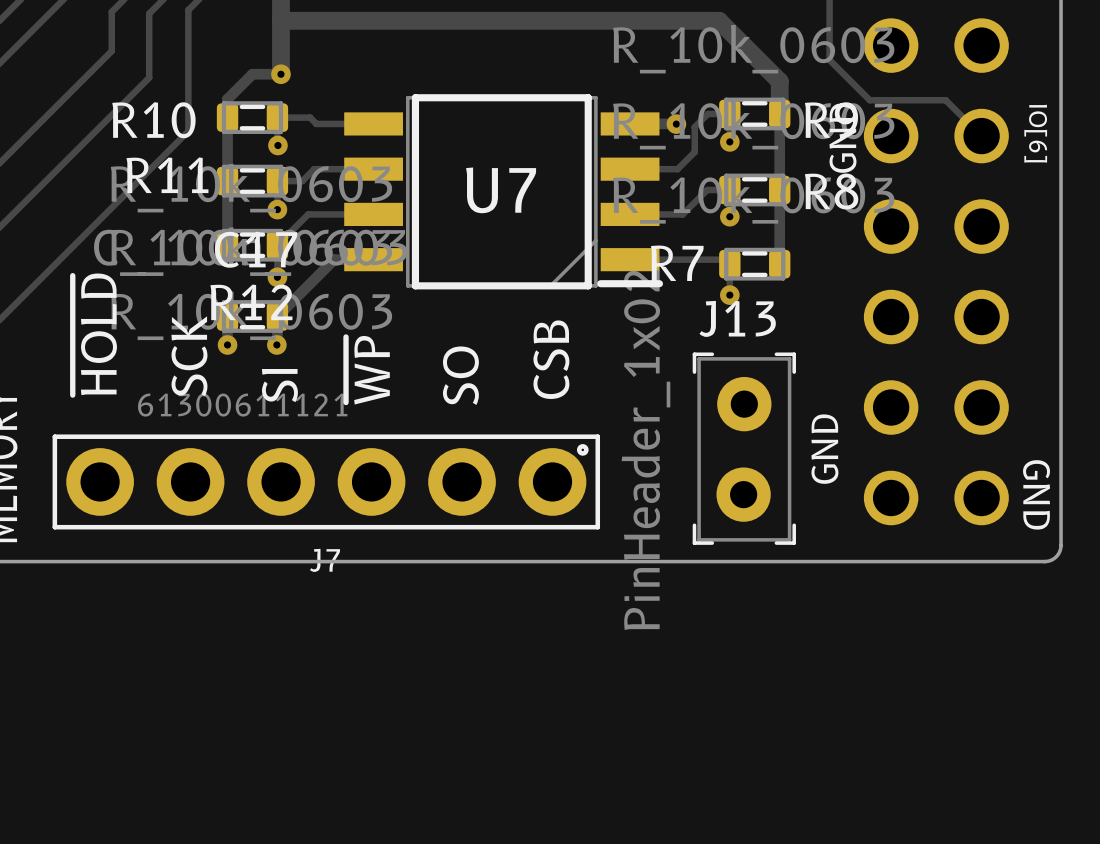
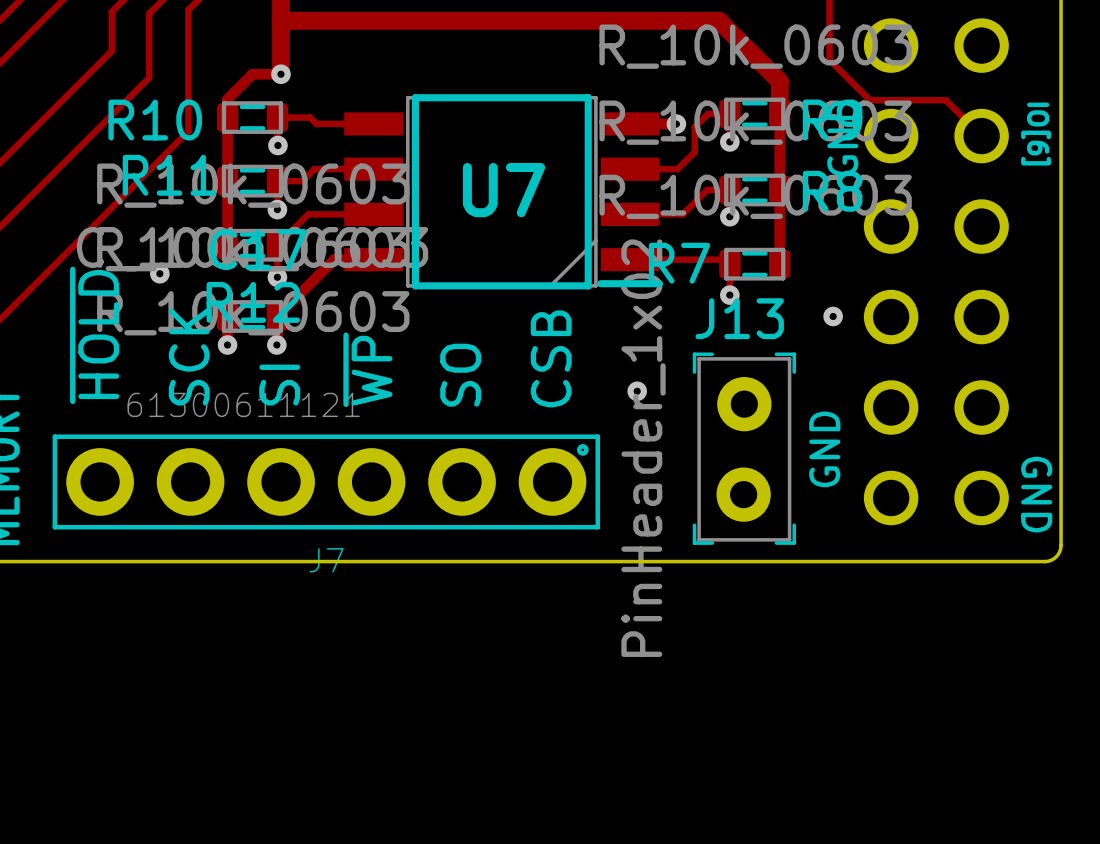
via: none -> (159, 273)
via: none -> (833, 316)
via: none -> (637, 391)

